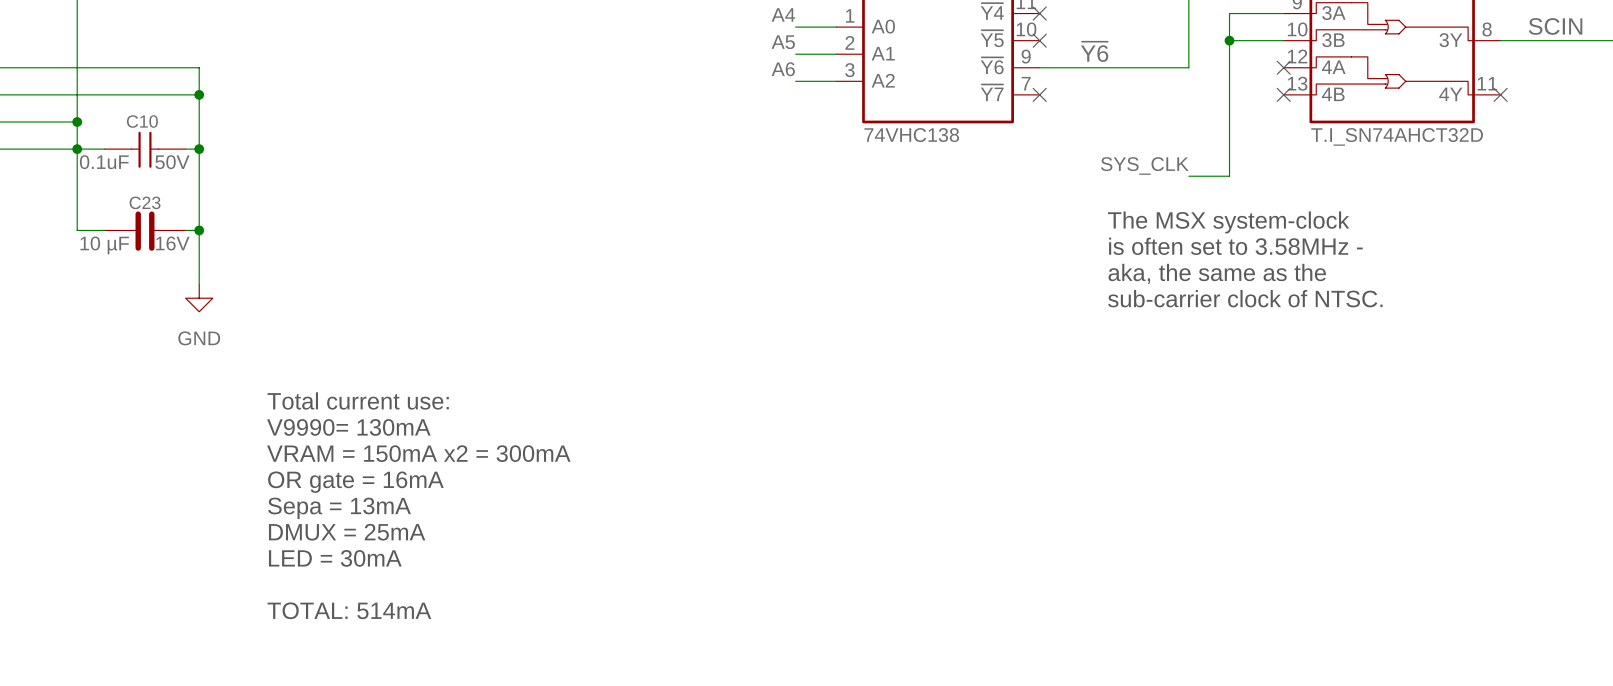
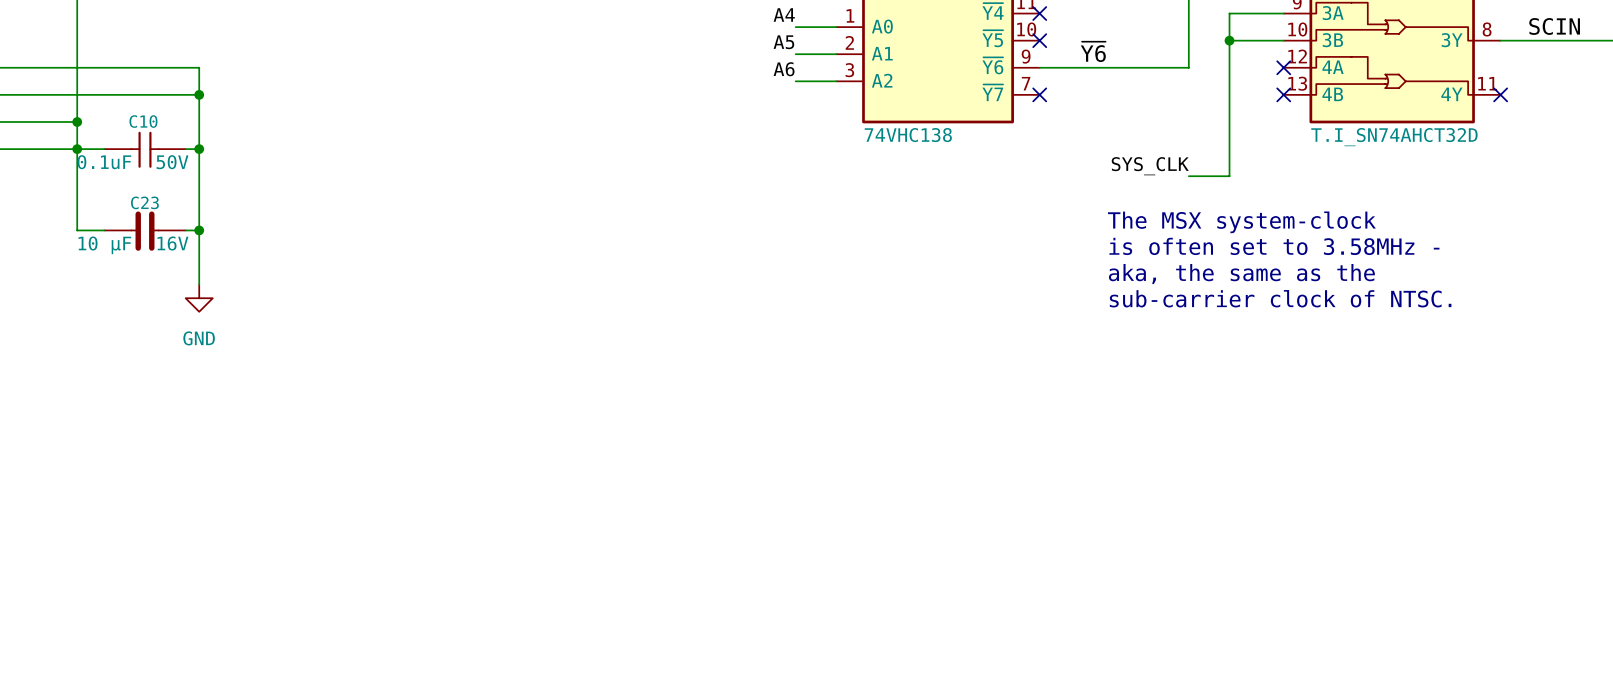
text: Total current use: (358, 400) -> none
text: V9990= 130mA (348, 427) -> none
text: VRAM = 150mA x2 = 300mA (418, 453) -> none
text: OR gate = 16mA (355, 482) -> none
text: Sepa = 13mA (339, 508) -> none
text: DMUX = 25mA (347, 532) -> none
text: LED = 30mA (335, 558) -> none
text: TOTAL: 514mA (349, 610) -> none

